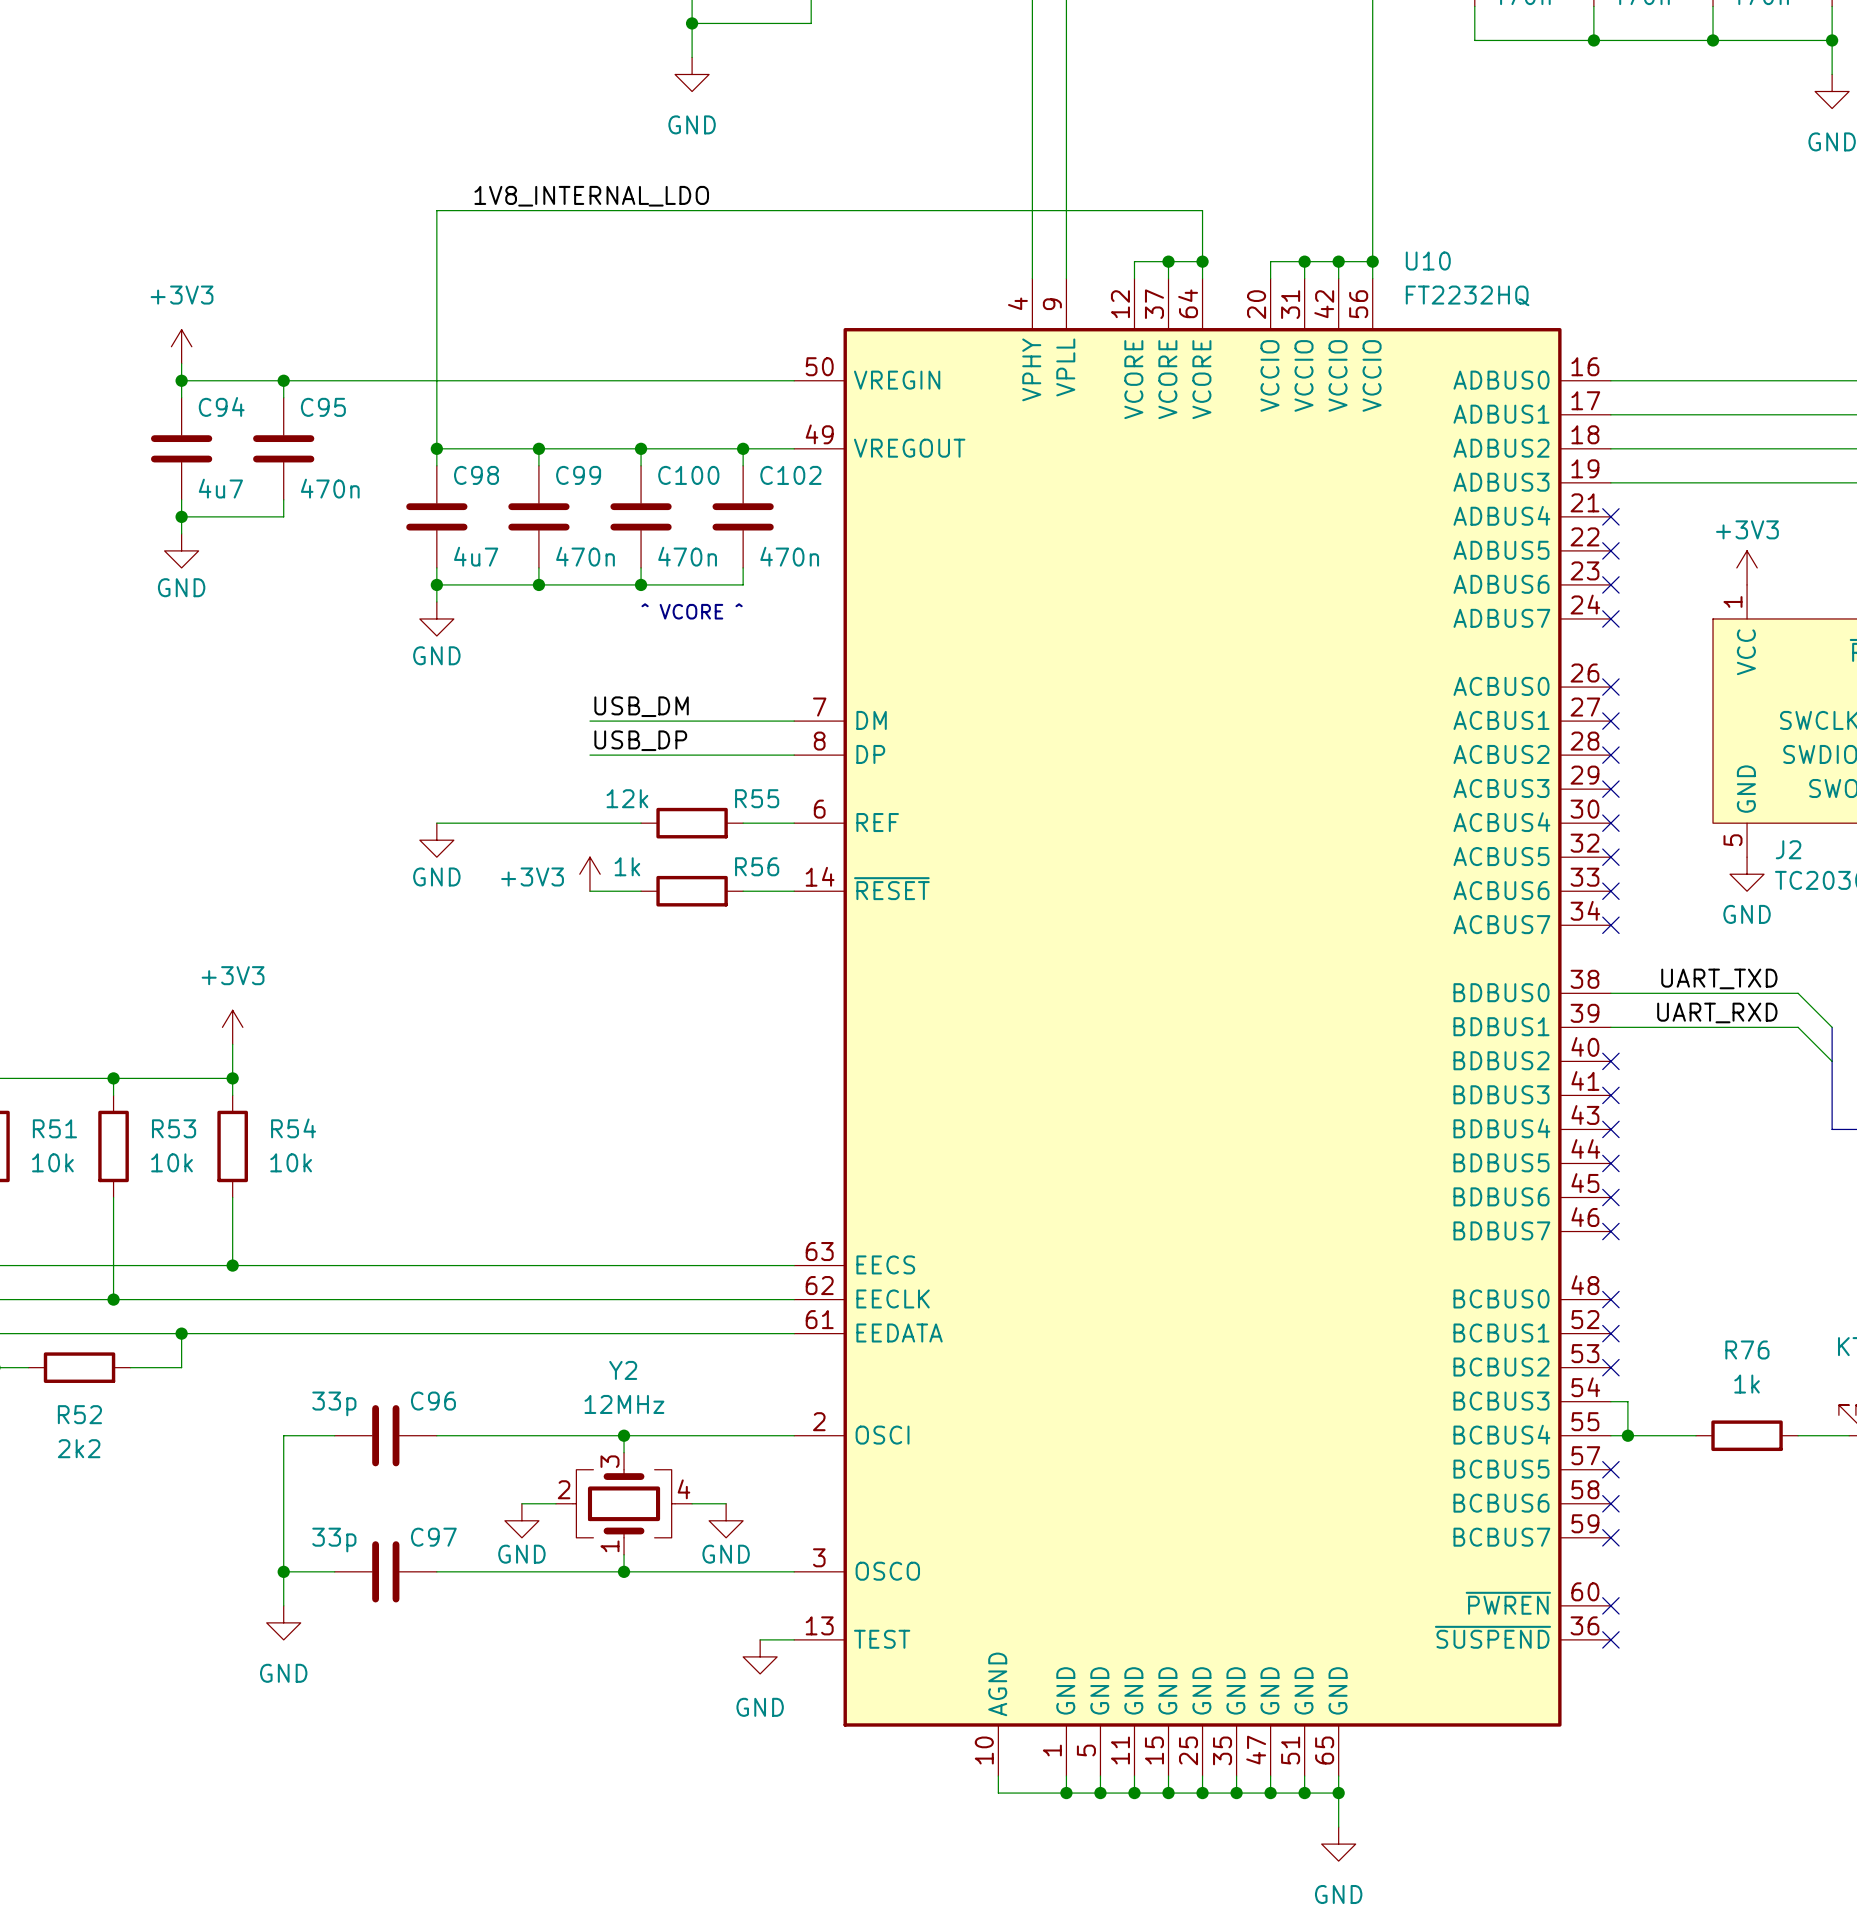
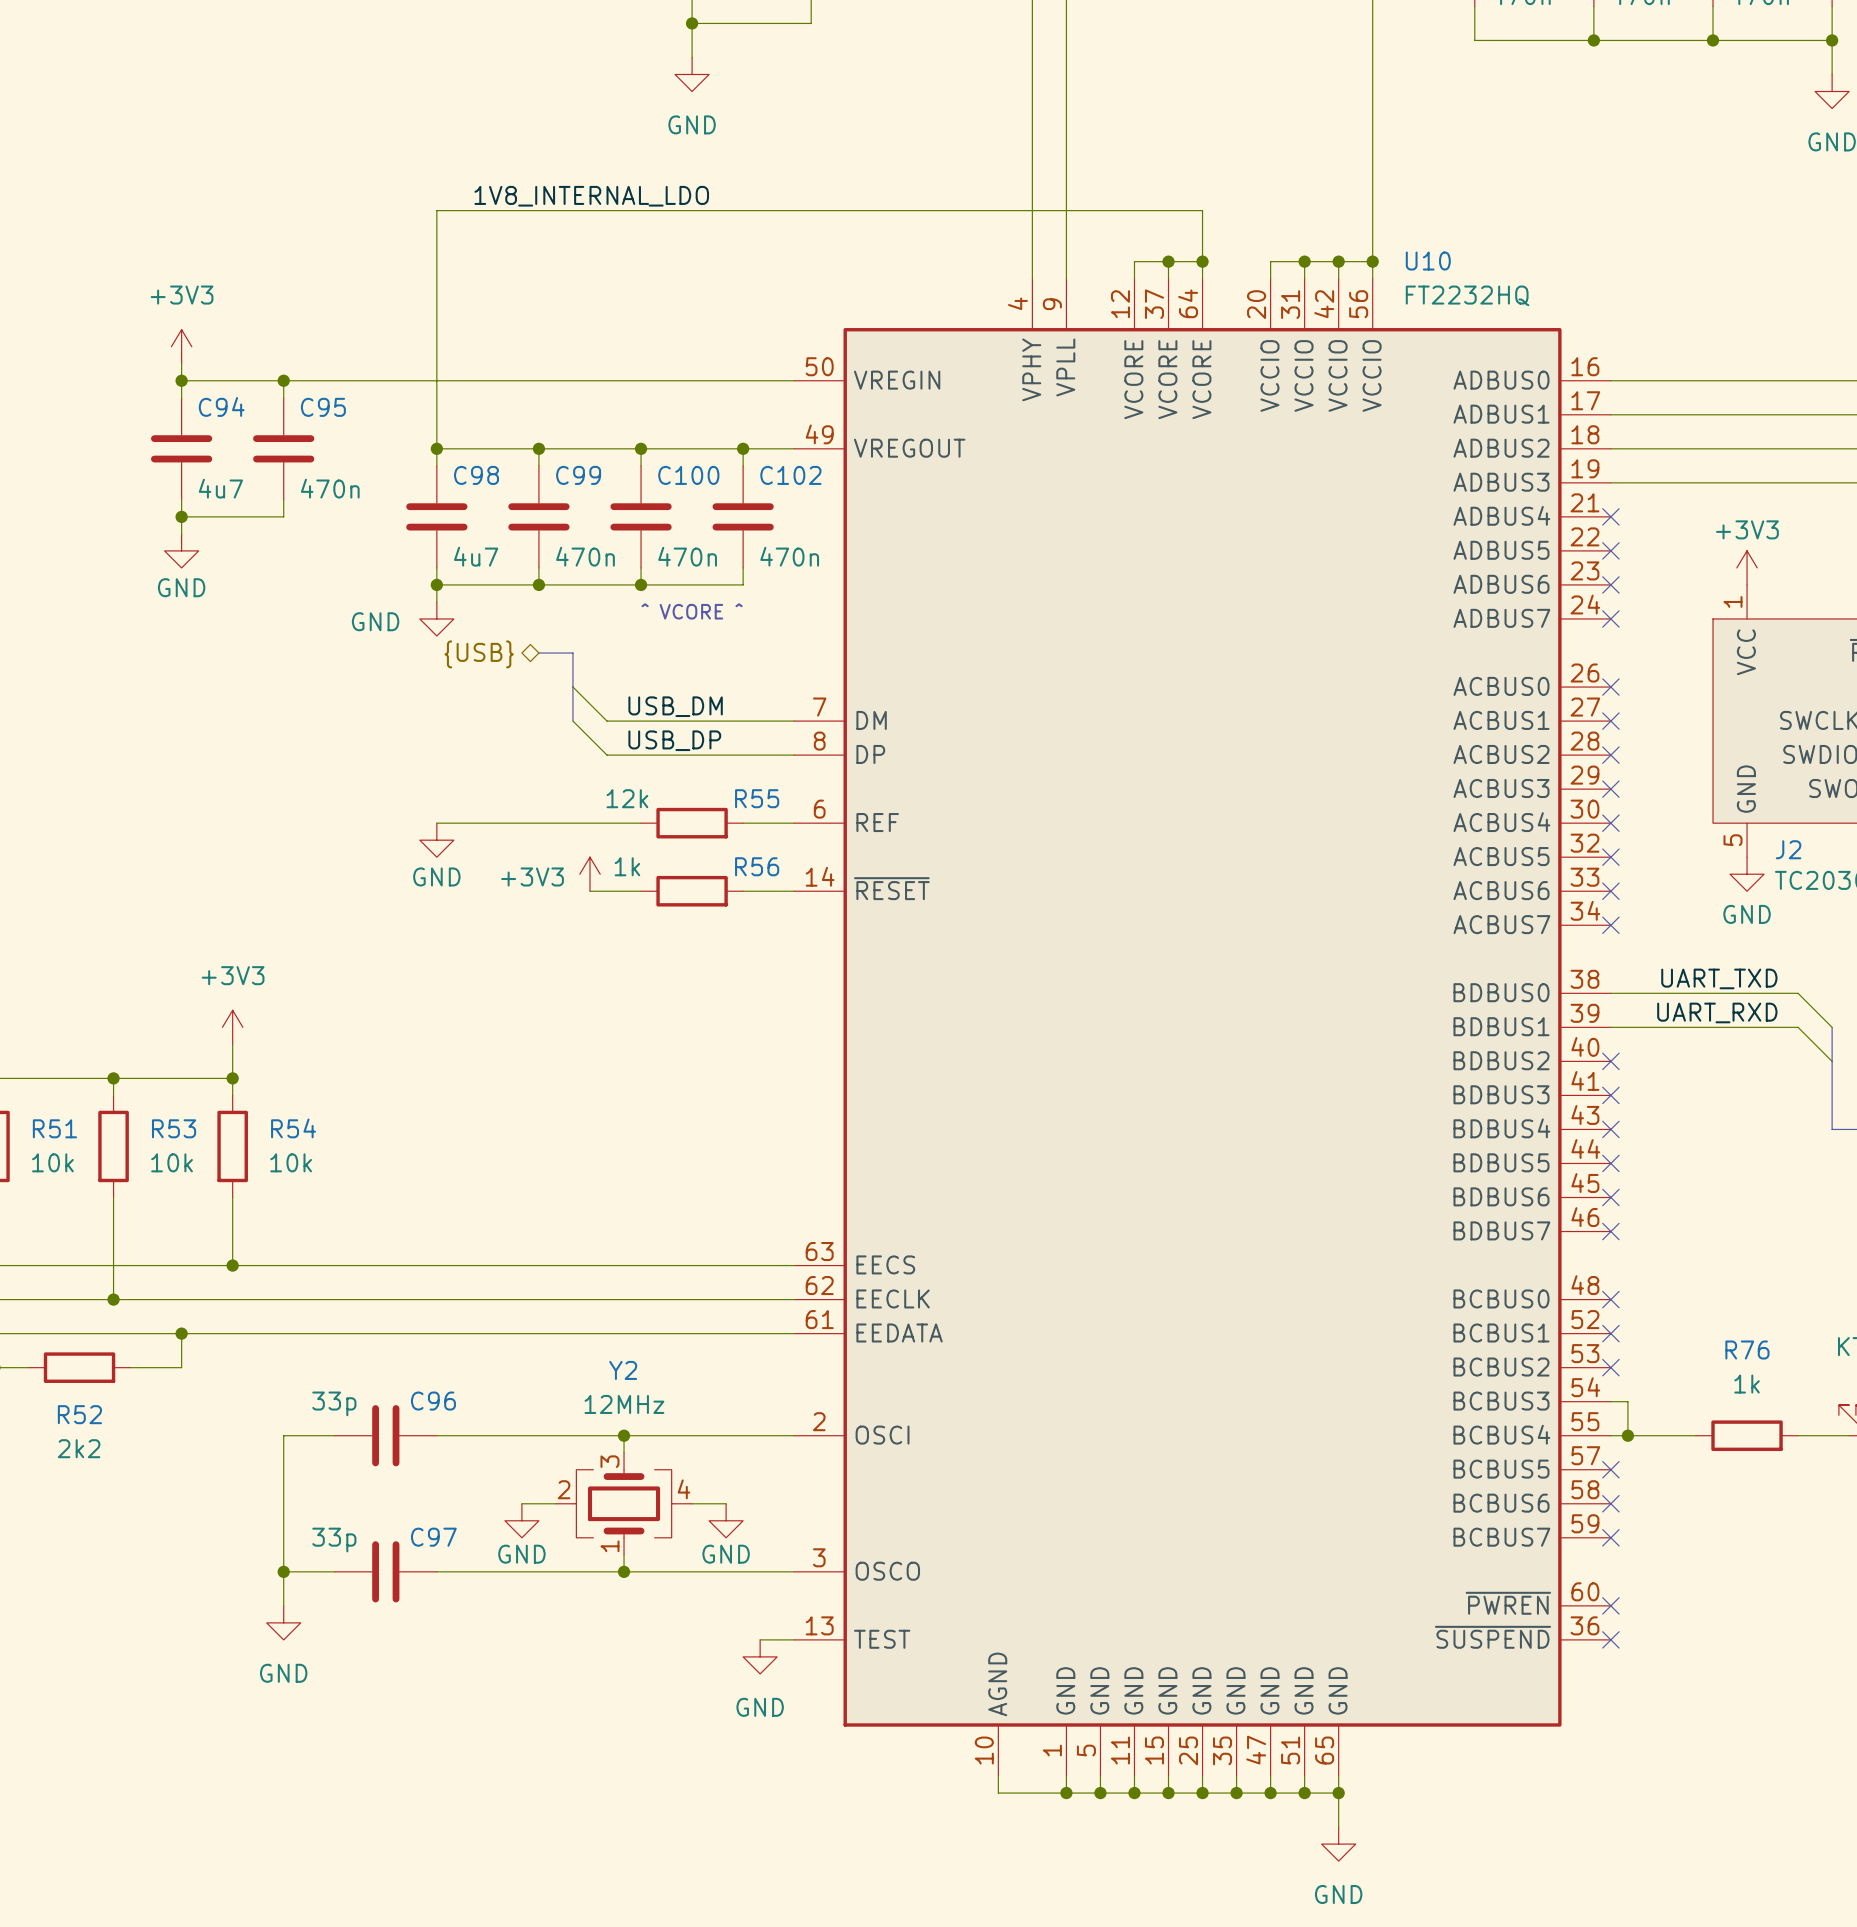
bus: none -> (538, 653) (572, 653) (572, 721)
hierarchical label: none -> {USB} (479, 654)
power symbol text position: GND (436, 655) -> GND (375, 621)
label position: USB_DM (641, 706) -> USB_DM (675, 706)
wire: (589, 721) (607, 721) -> (572, 687) (607, 721)
label position: USB_DP (640, 740) -> USB_DP (674, 740)
wire: (589, 755) (607, 755) -> (572, 721) (607, 755)

